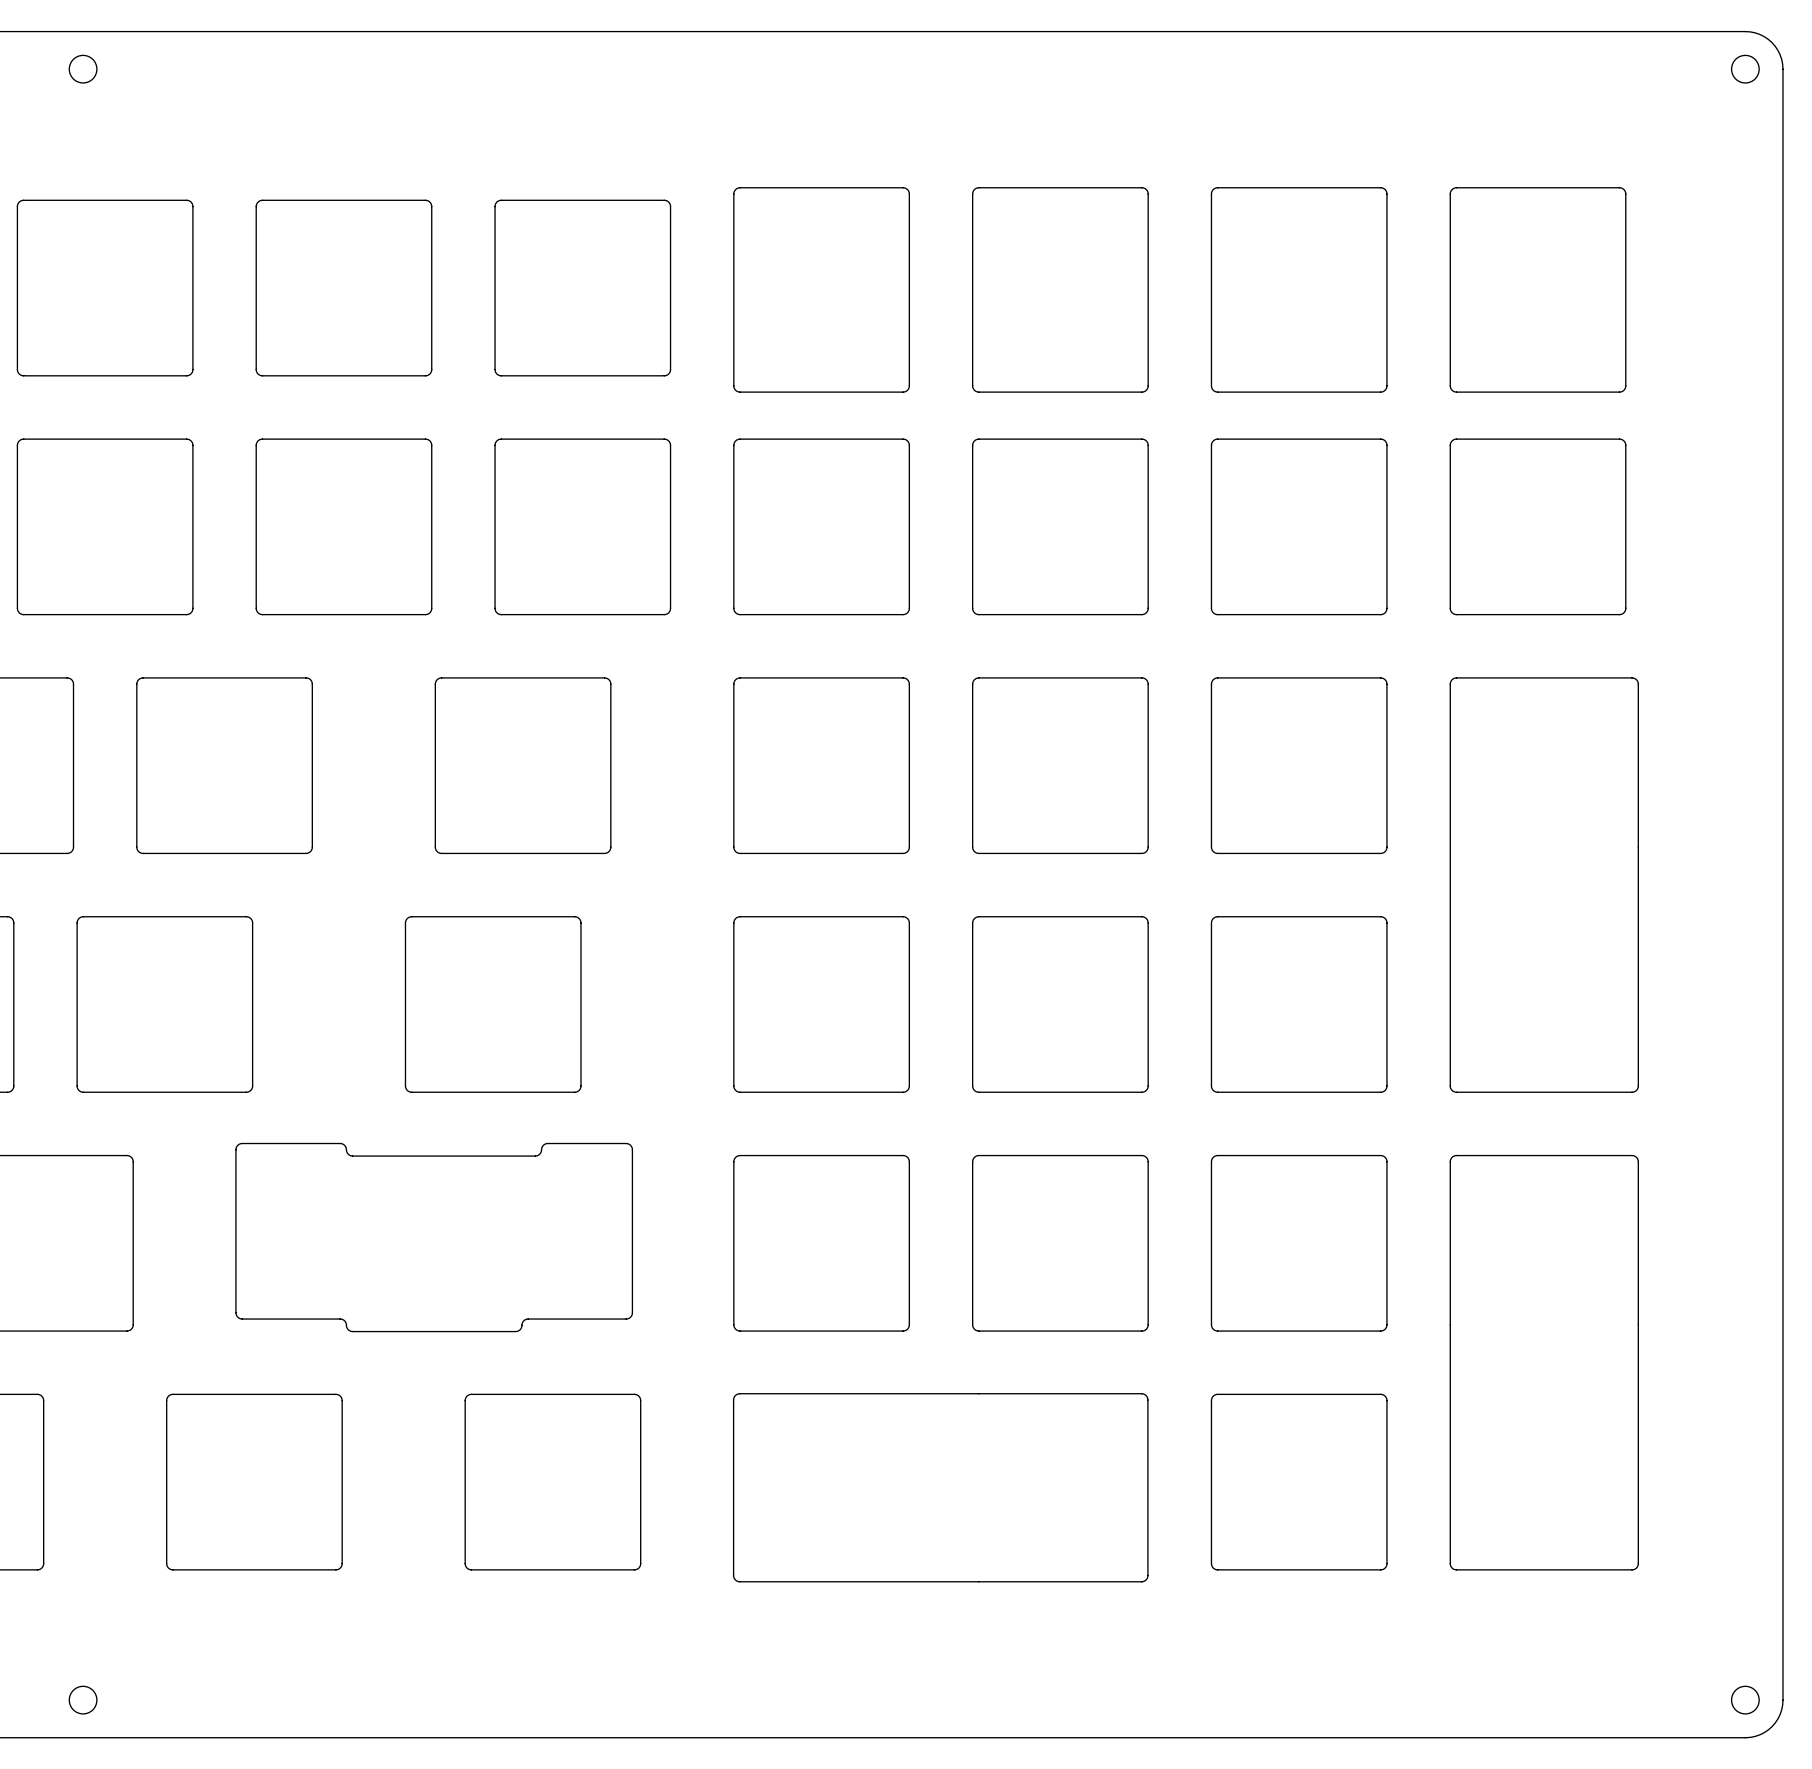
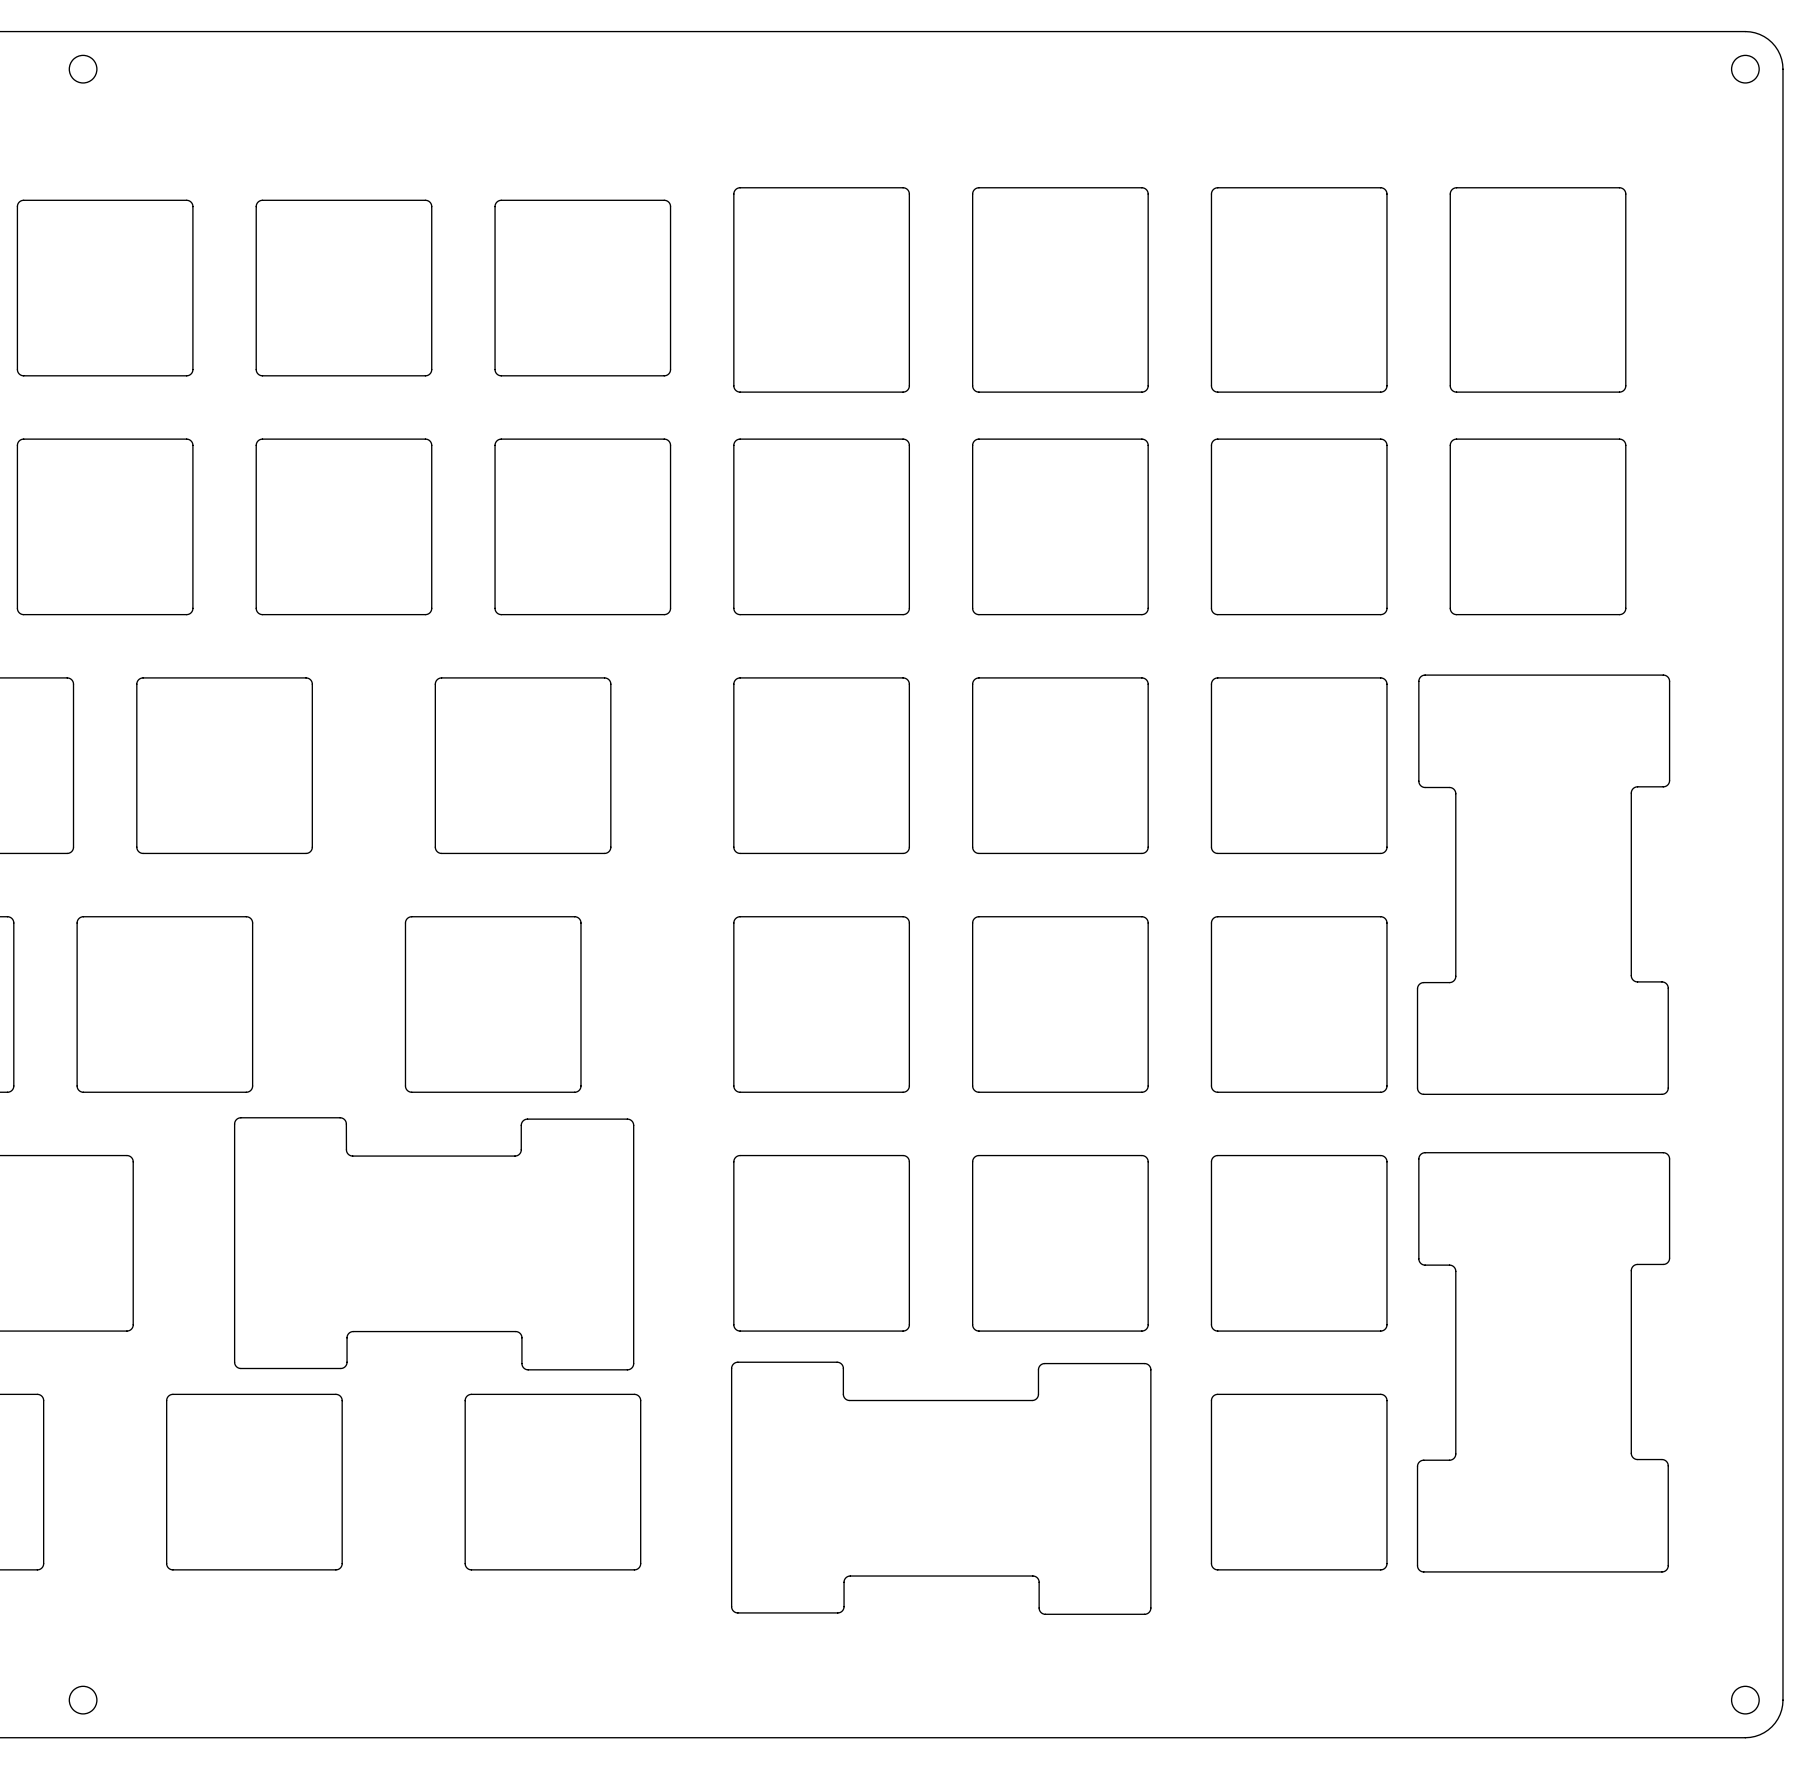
board edge: (1632, 677) (1456, 677) (1450, 681) (1450, 1085) (1454, 1091) (1632, 1092) (1637, 1088) (1638, 684) (1636, 679) (1632, 677) -> (1663, 675) (1667, 676) (1669, 681) (1669, 782) (1664, 786) (1635, 787) (1631, 792) (1631, 975) (1635, 981) (1662, 981) (1668, 986) (1667, 1091) (1661, 1094) (1420, 1093) (1417, 1088) (1417, 987) (1422, 982) (1451, 982) (1455, 977) (1455, 793) (1451, 787) (1424, 787) (1419, 782) (1419, 678) (1425, 675) (1663, 675)
board edge: (346, 1149) (344, 1145) (340, 1143) (242, 1143) (237, 1145) (235, 1312) (237, 1317) (242, 1319) (340, 1319) (345, 1321) (348, 1329) (353, 1331) -> (346, 1149) (346, 1123) (341, 1117) (240, 1117) (235, 1120) (234, 1363) (240, 1368) (342, 1368) (346, 1363) (347, 1336) (353, 1331)
board edge: (1632, 1155) (1456, 1155) (1450, 1159) (1450, 1563) (1454, 1569) (1632, 1569) (1637, 1566) (1638, 1161) (1636, 1157) (1632, 1155) -> (1663, 1152) (1667, 1154) (1669, 1158) (1669, 1259) (1664, 1264) (1635, 1264) (1631, 1269) (1631, 1453) (1635, 1459) (1662, 1459) (1668, 1464) (1667, 1568) (1661, 1571) (1420, 1571) (1417, 1565) (1417, 1464) (1422, 1460) (1451, 1460) (1455, 1454) (1455, 1271) (1451, 1265) (1424, 1265) (1419, 1260) (1419, 1155) (1425, 1152) (1663, 1152)
board edge: (515, 1156) (537, 1155) (542, 1145) (547, 1143) (626, 1143) (630, 1145) (632, 1149) (631, 1315) (626, 1319) (527, 1319) (523, 1321) (520, 1329) (515, 1331) -> (515, 1156) (521, 1151) (521, 1124) (525, 1119) (627, 1119) (633, 1123) (632, 1366) (627, 1369) (526, 1369) (522, 1364) (521, 1336) (515, 1331)
board edge: (1141, 1393) (737, 1394) (733, 1400) (734, 1577) (739, 1581) (1144, 1581) (1147, 1575) (1147, 1400) (1146, 1395) (1141, 1393) -> (837, 1362) (843, 1366) (843, 1395) (845, 1398) (849, 1400) (1033, 1400) (1038, 1395) (1038, 1369) (1043, 1363) (1148, 1364) (1150, 1369) (1149, 1611) (1144, 1614) (1043, 1614) (1039, 1608) (1038, 1580) (1032, 1576) (849, 1576) (844, 1580) (843, 1607) (839, 1612) (734, 1611) (731, 1606) (732, 1366) (737, 1362) (837, 1362)

